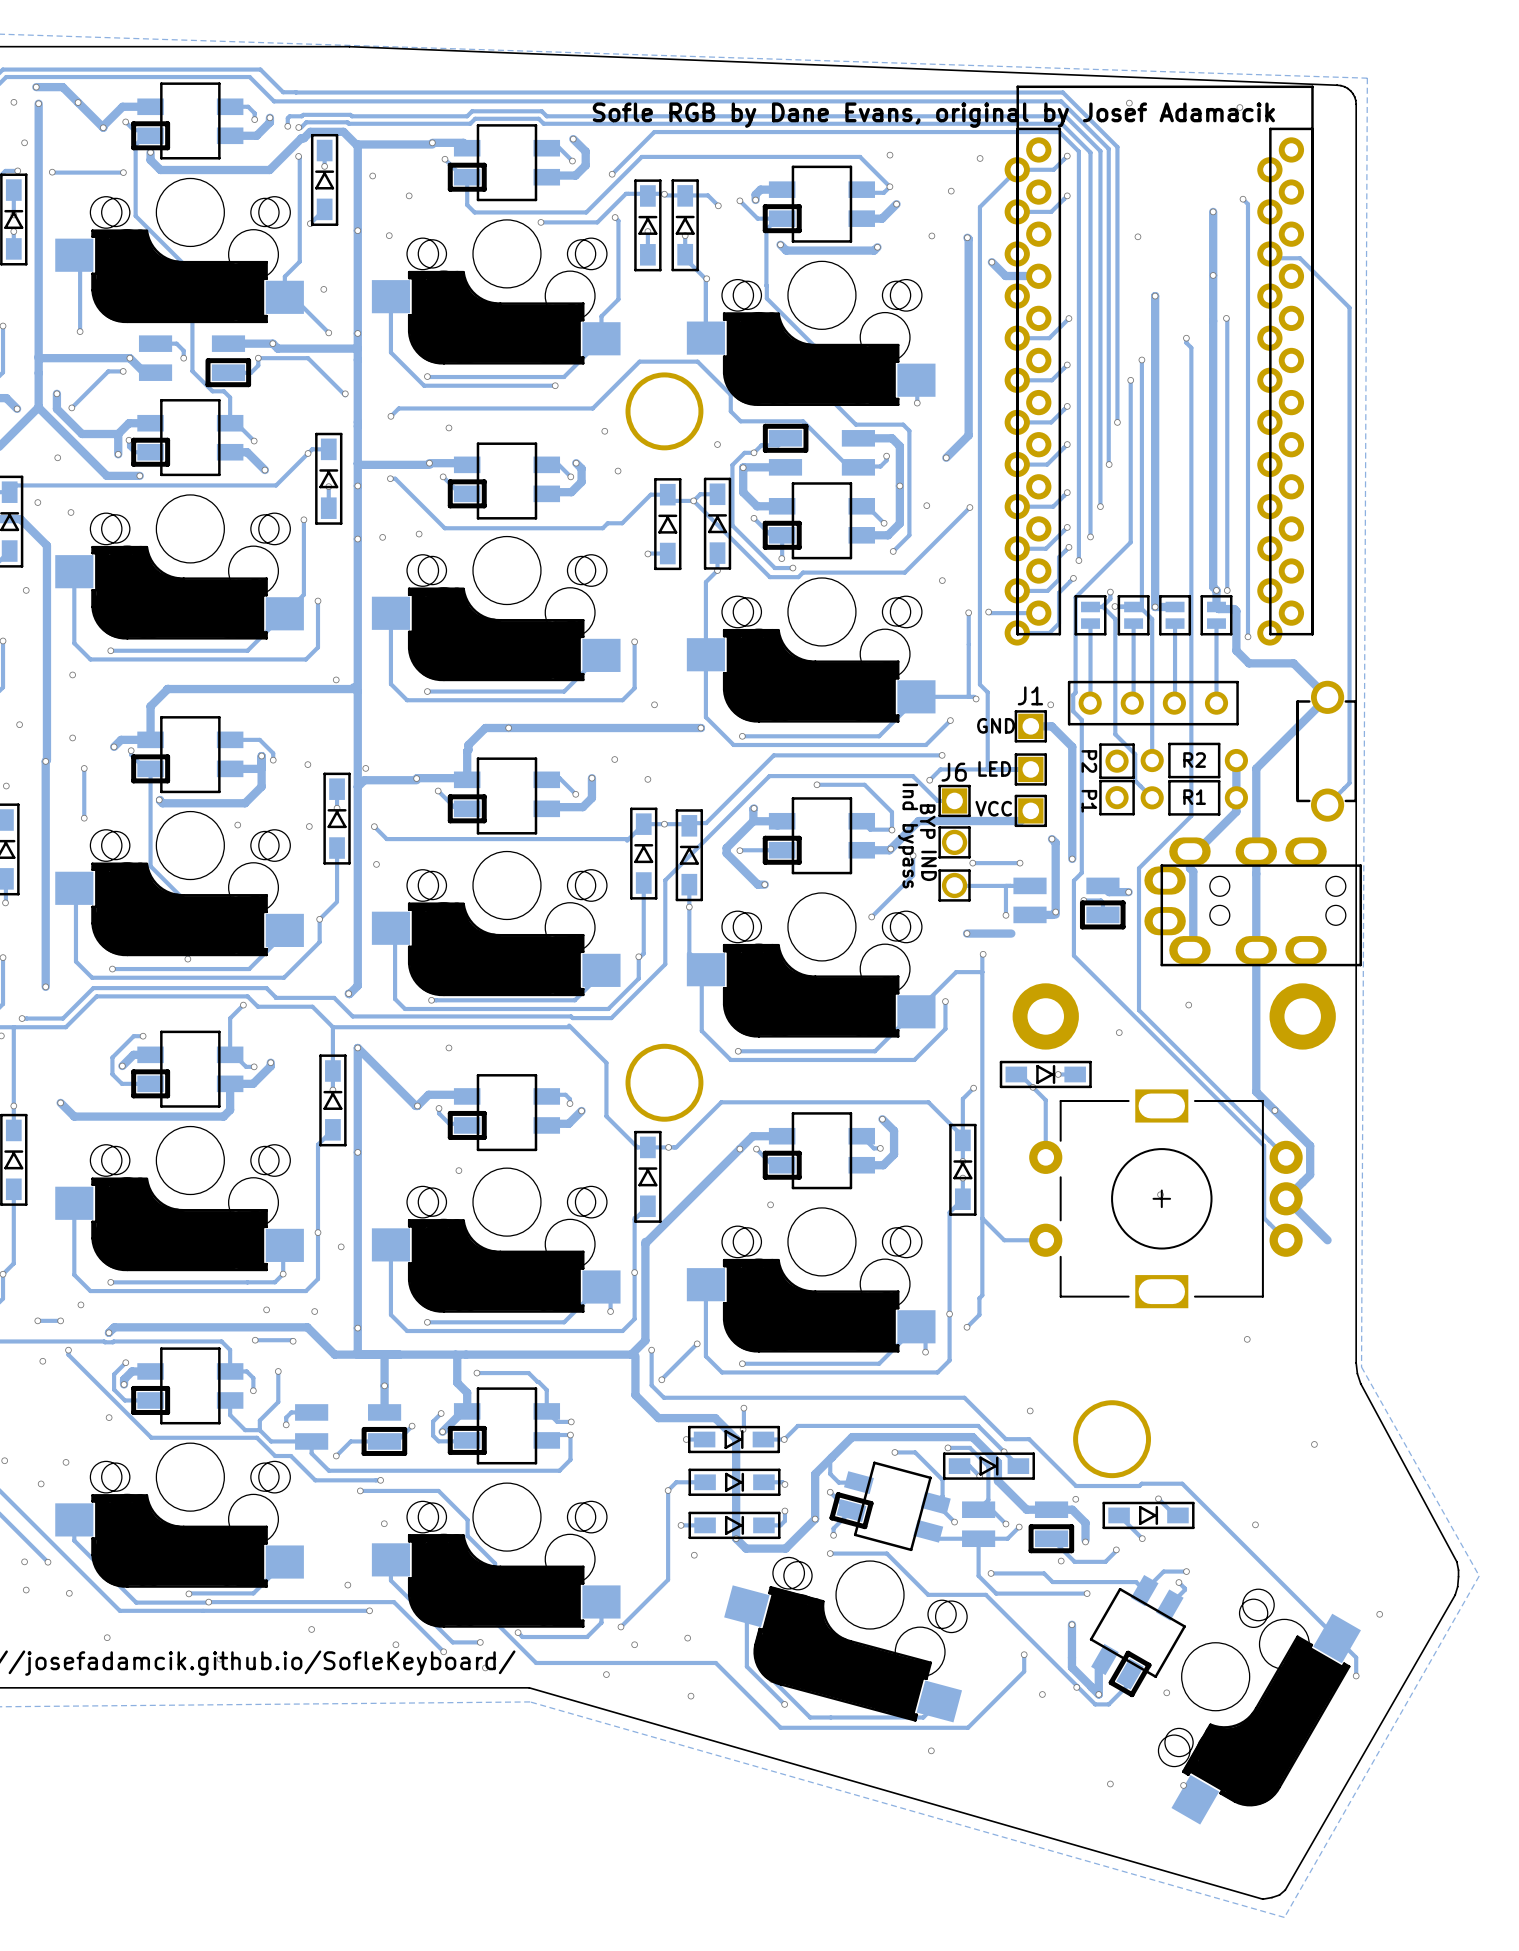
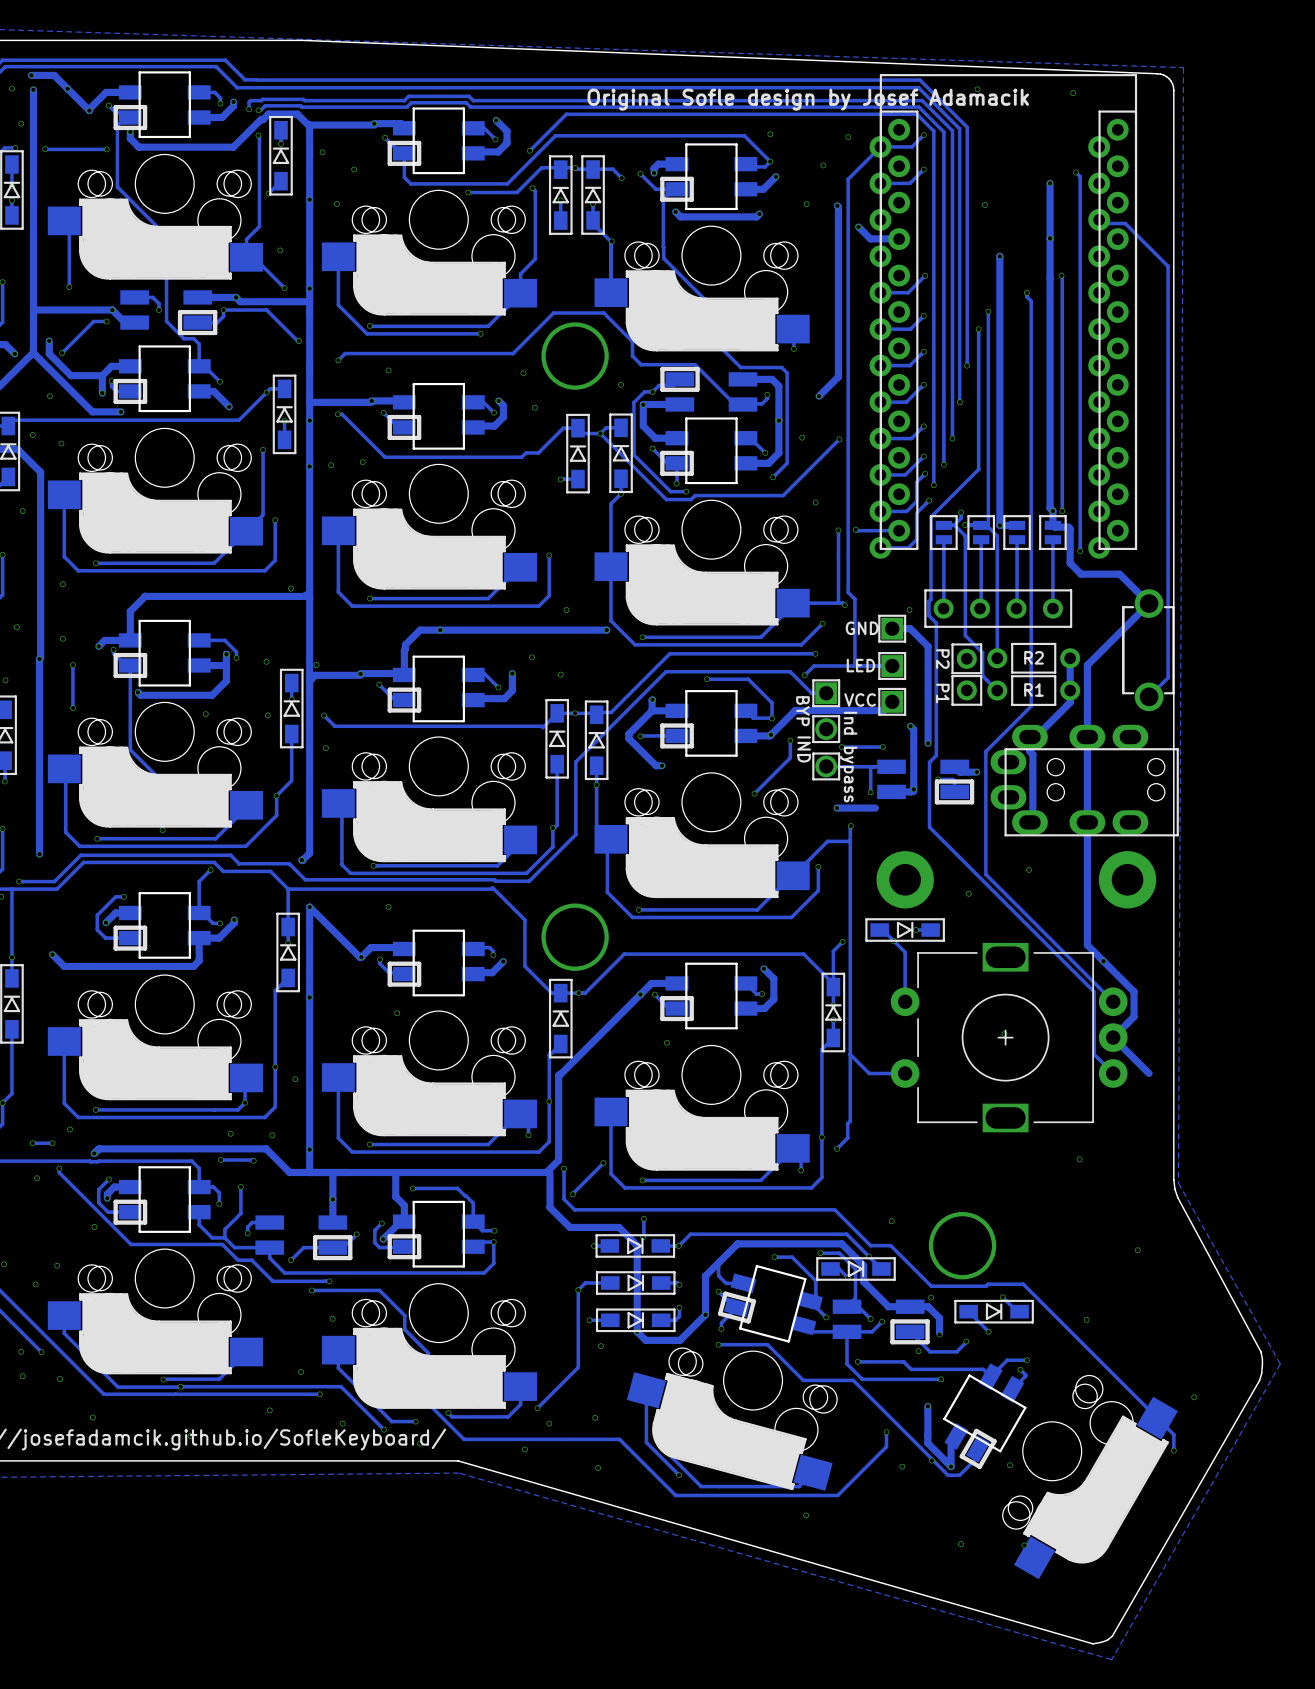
text: Sofle RGB by Dane Evans, original by Josef Adamacik (933, 115) -> Original Sofle design by Josef Adamacik (808, 99)
part text: J1 (1030, 695) -> none
part text: J6 (954, 772) -> none
text position: Ind bypass (908, 836) -> Ind bypass (848, 757)

